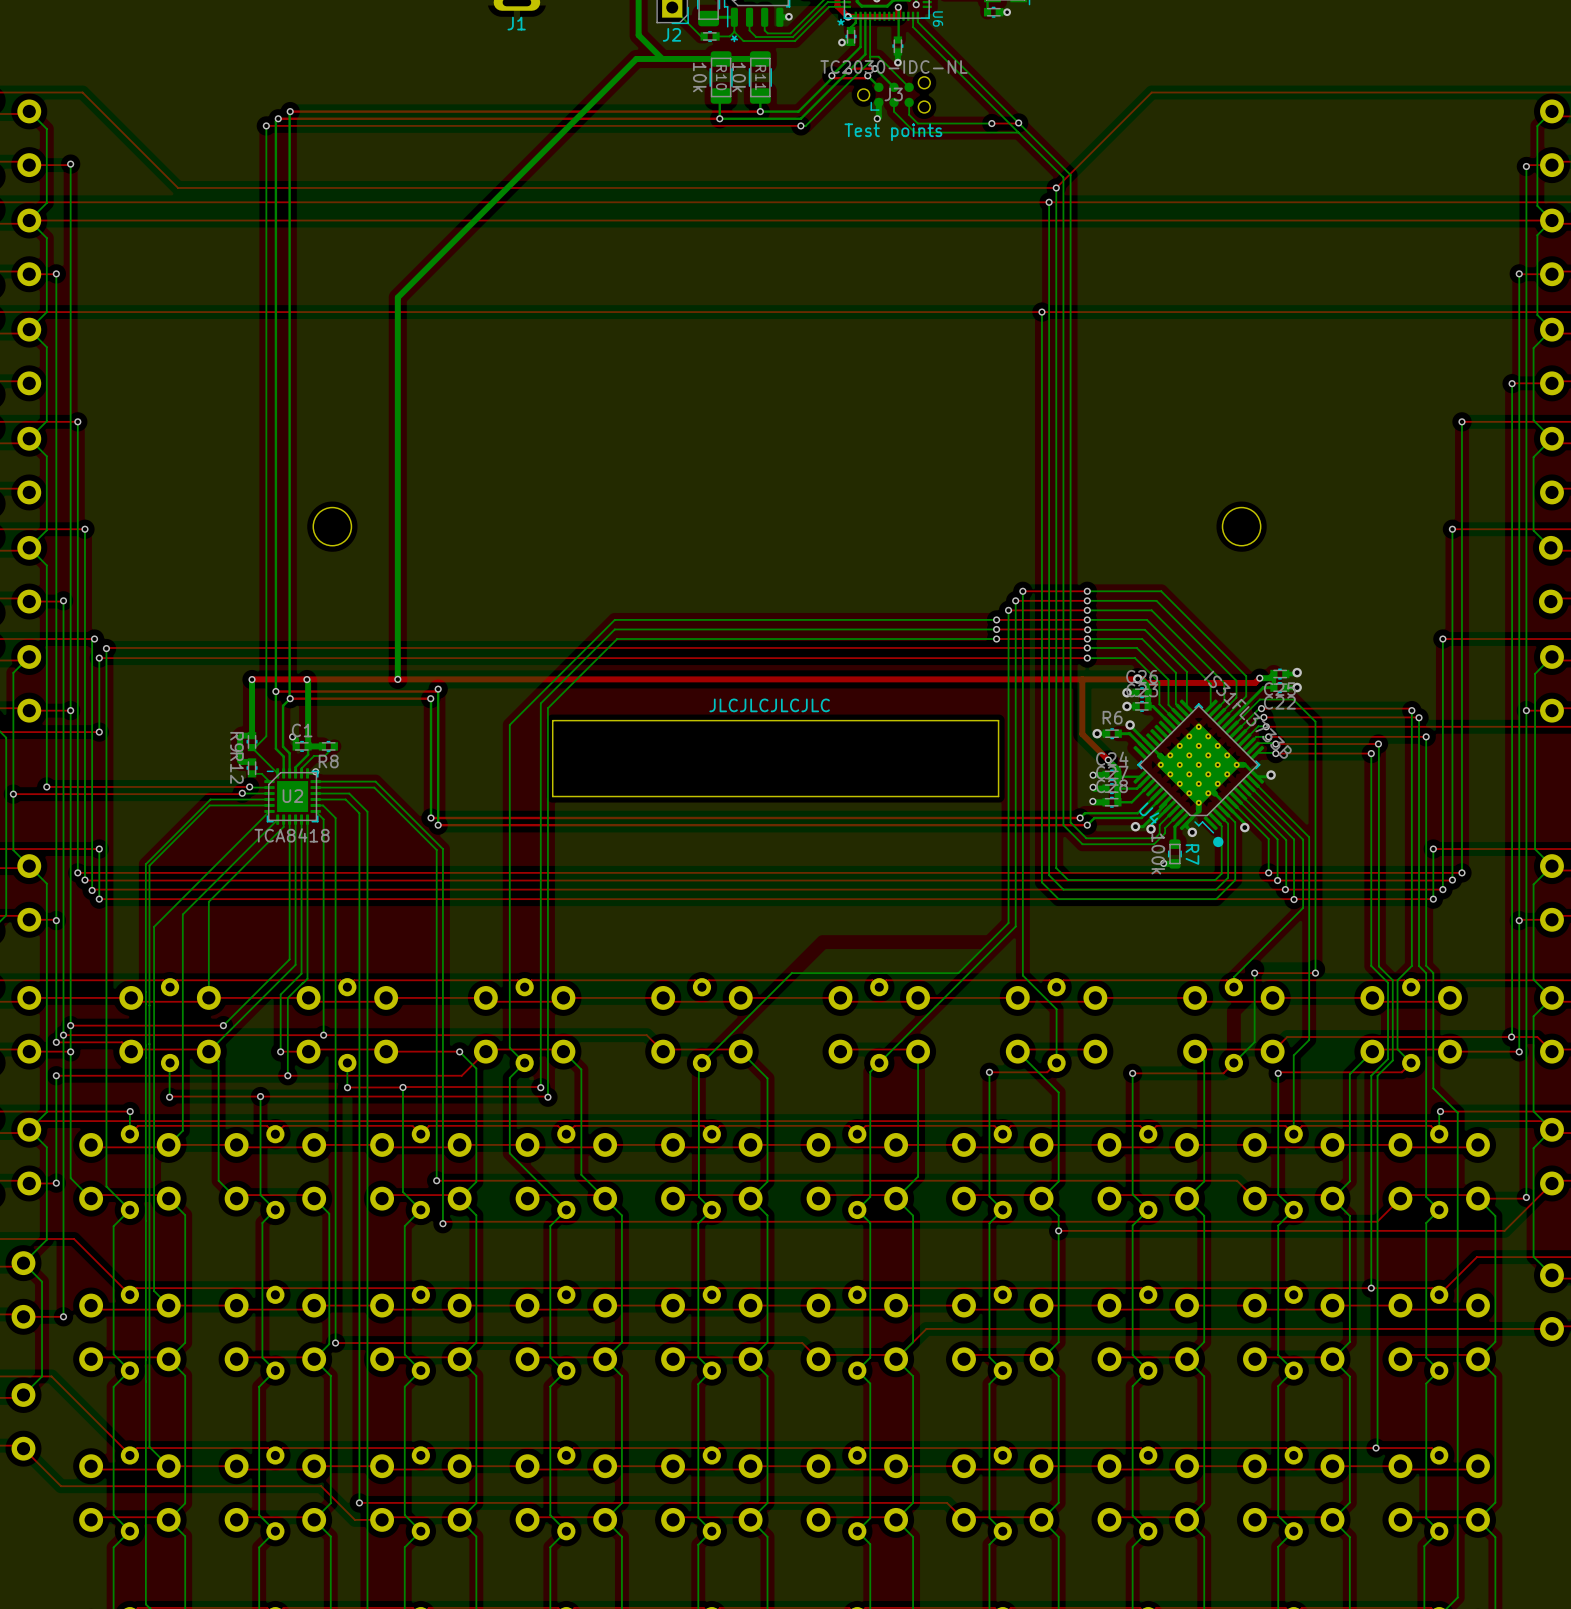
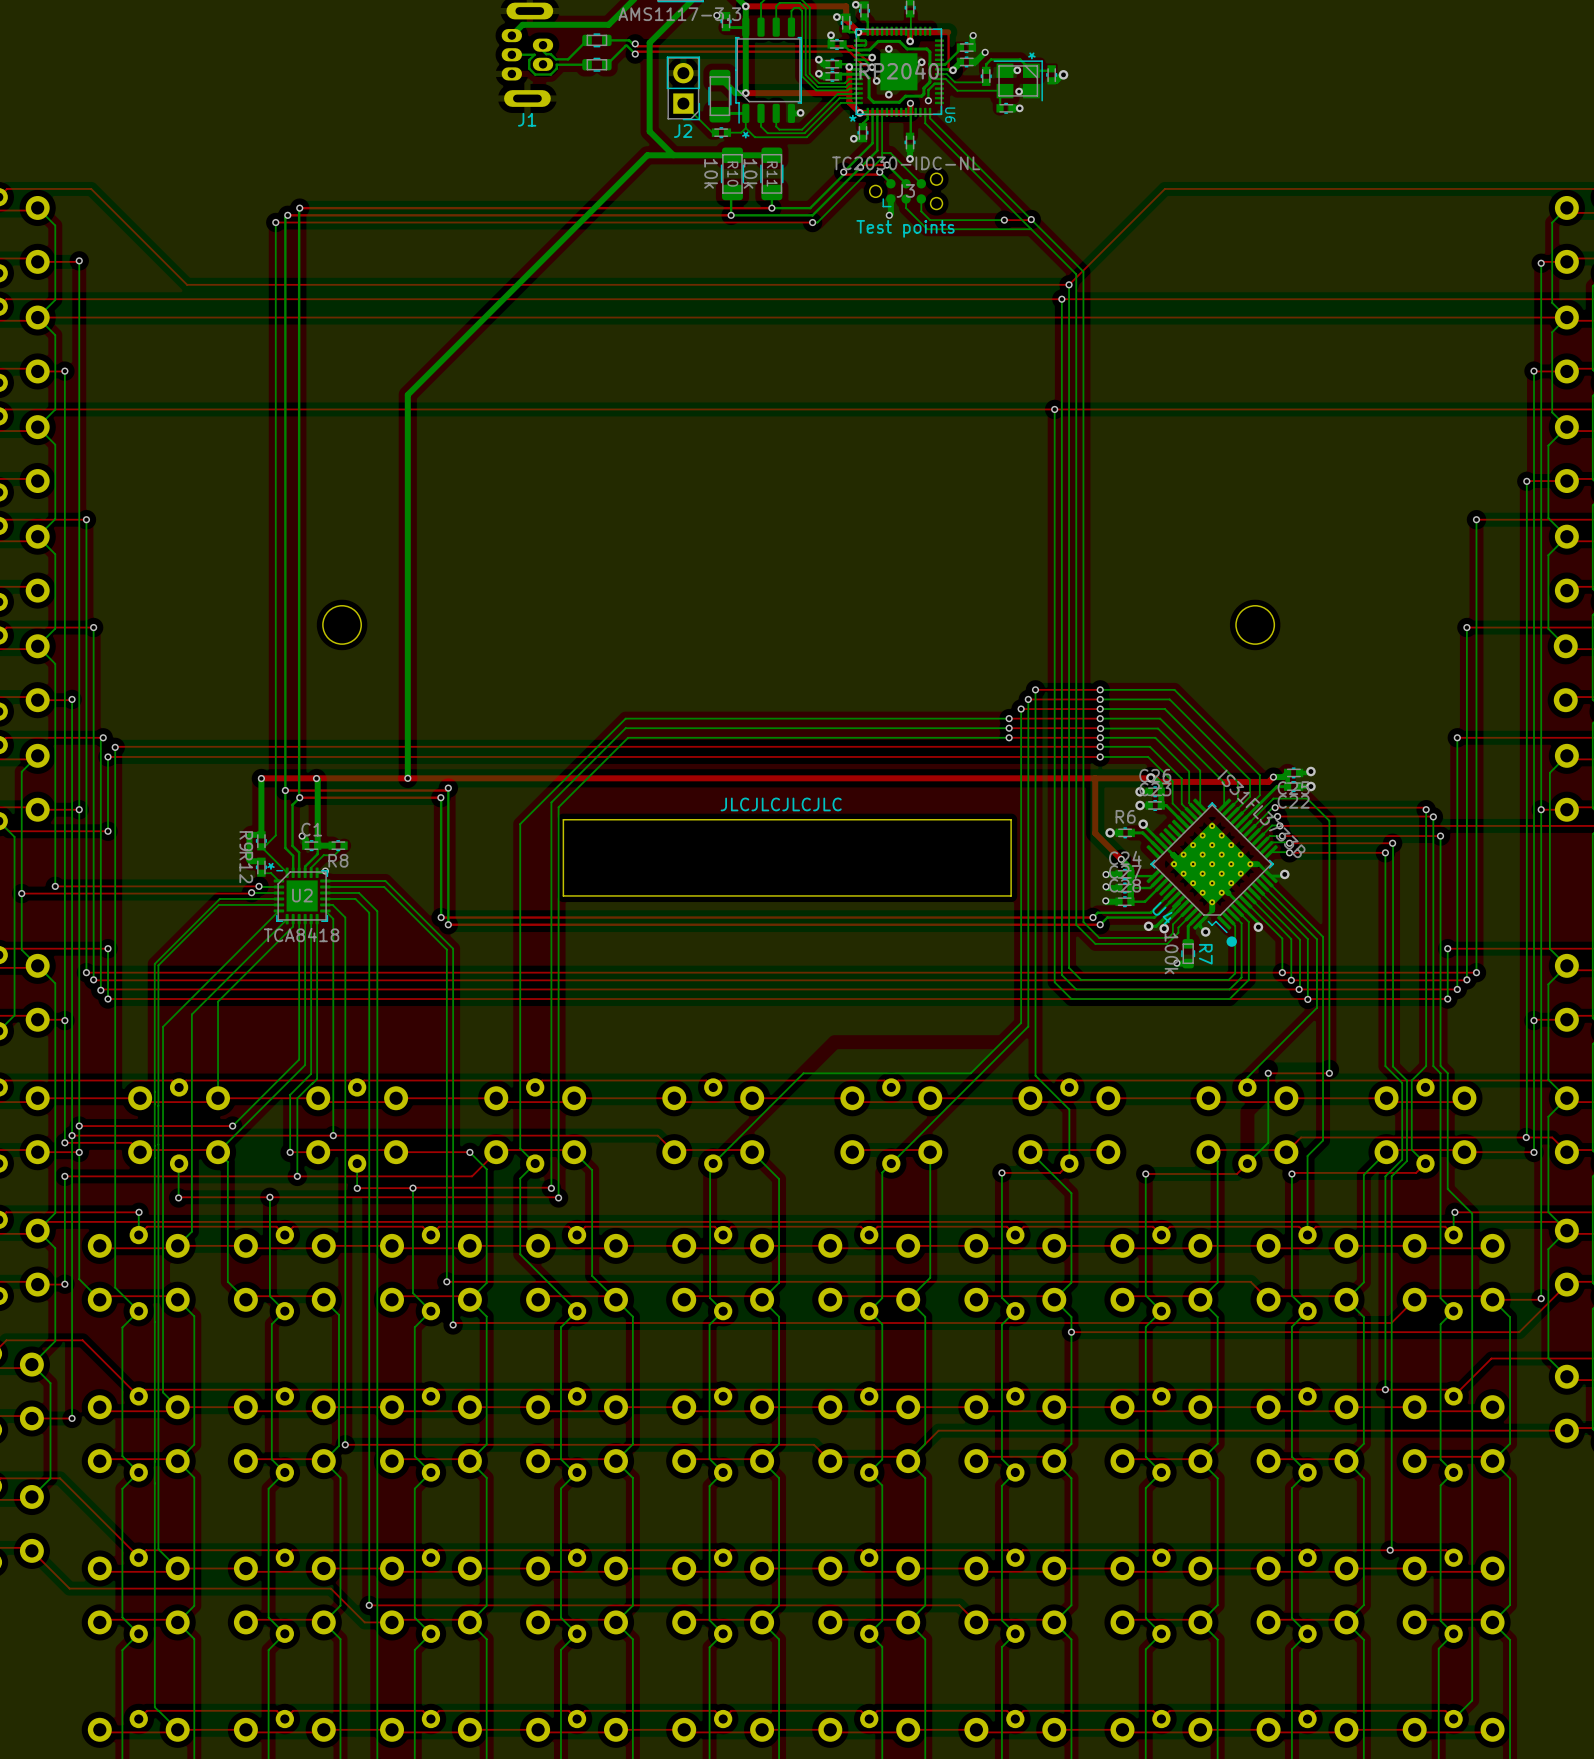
text: none -> * (270, 866)

